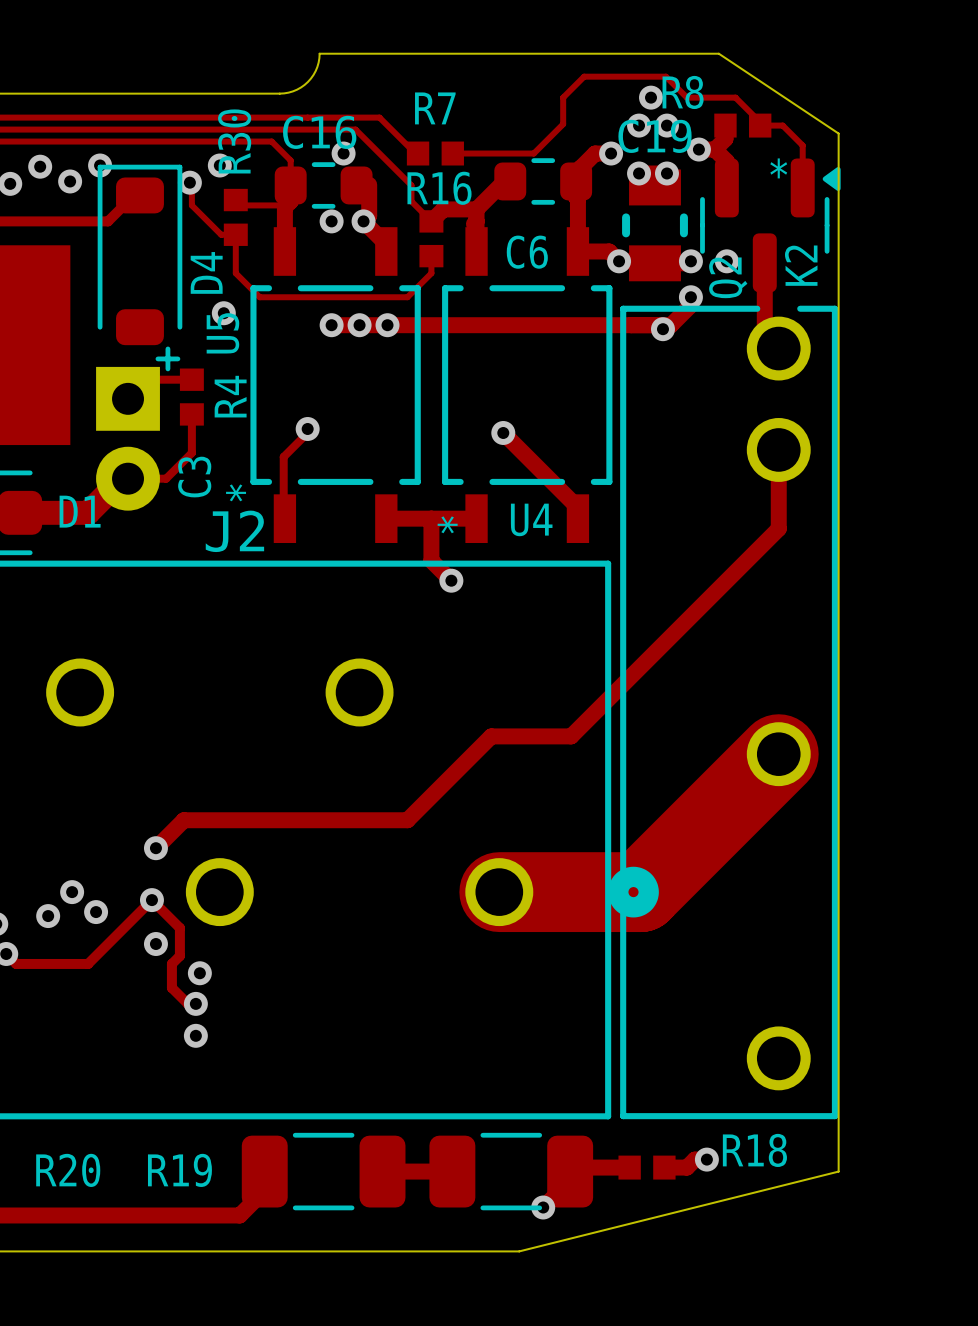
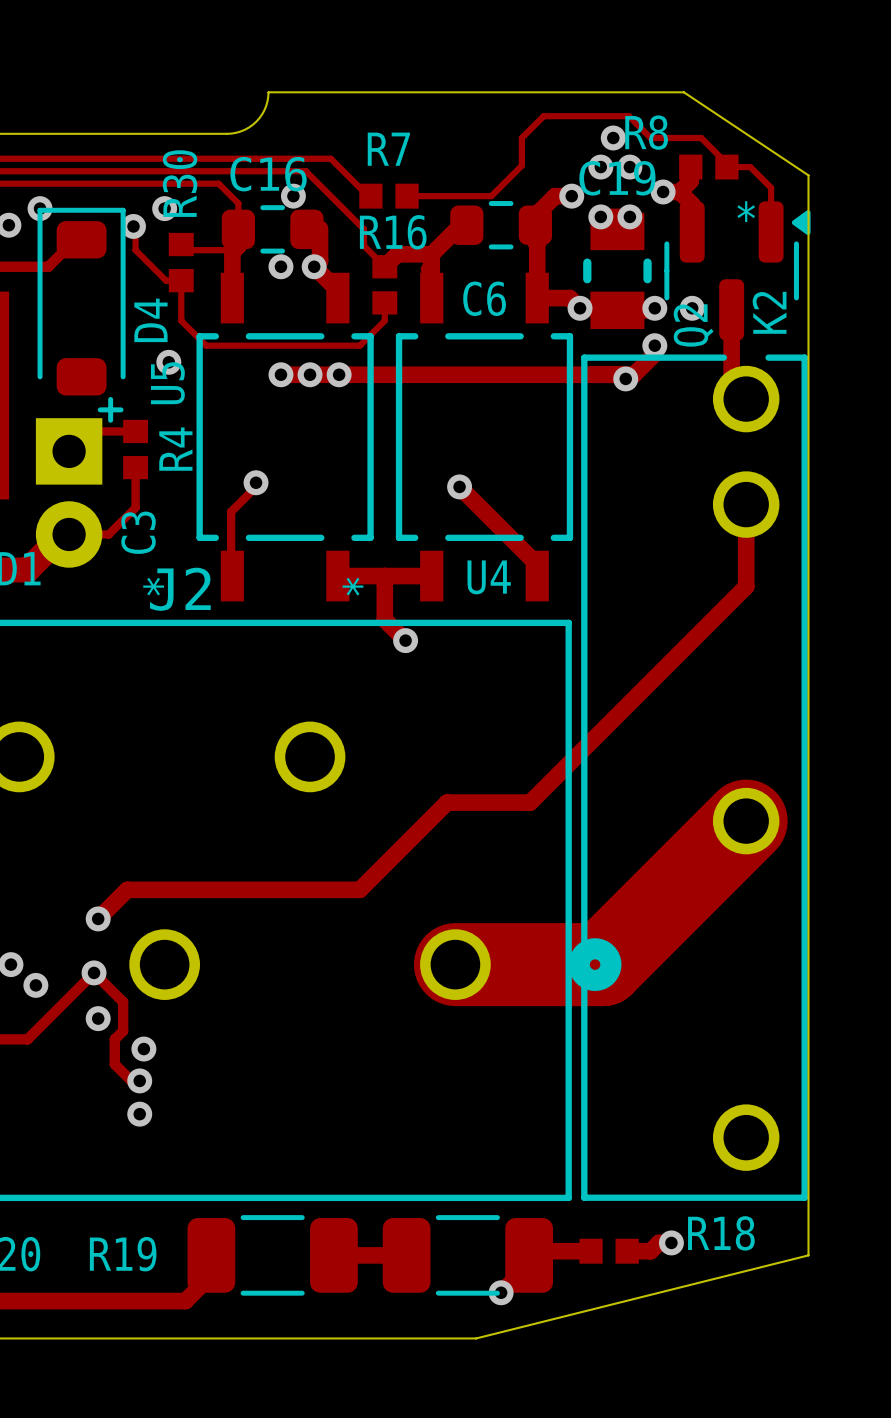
U5 text position: * (236, 492) -> * (153, 586)
U4 text position: * (447, 524) -> * (353, 586)

